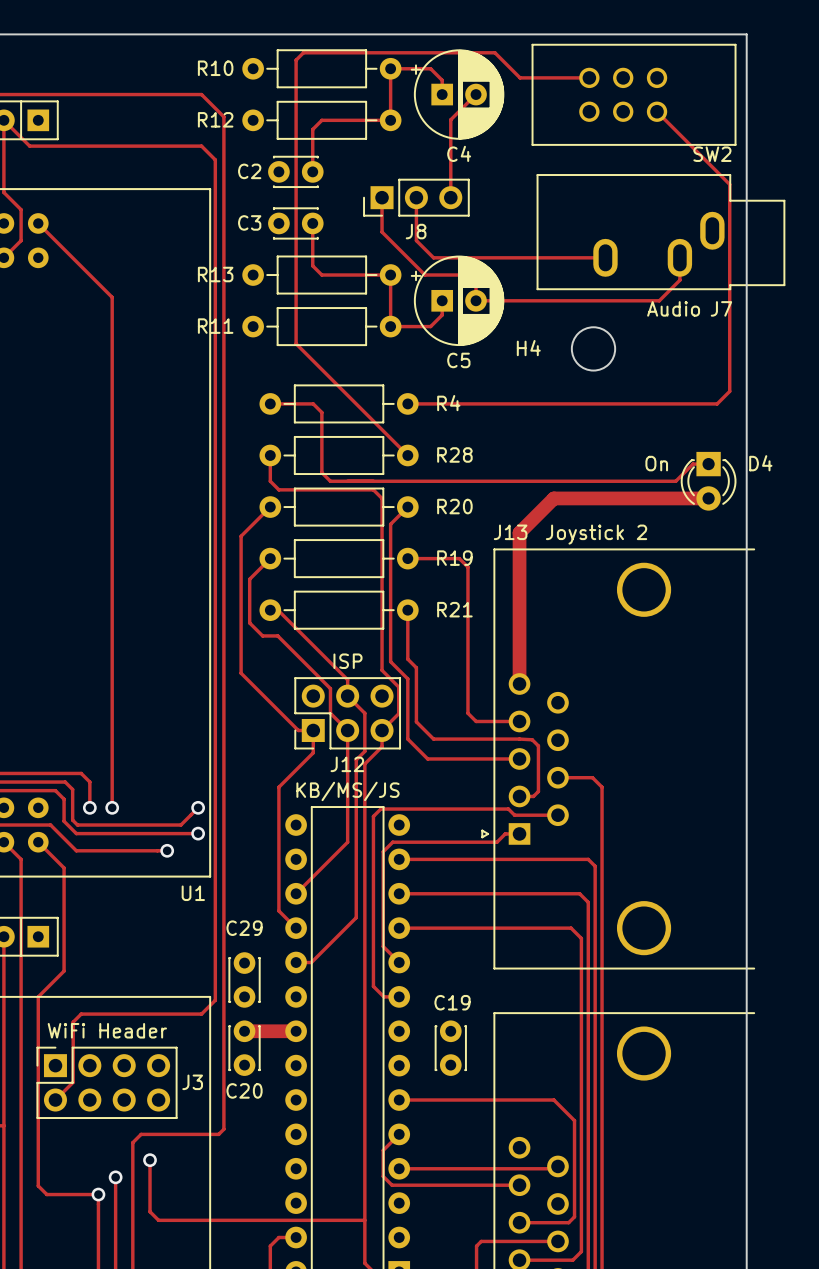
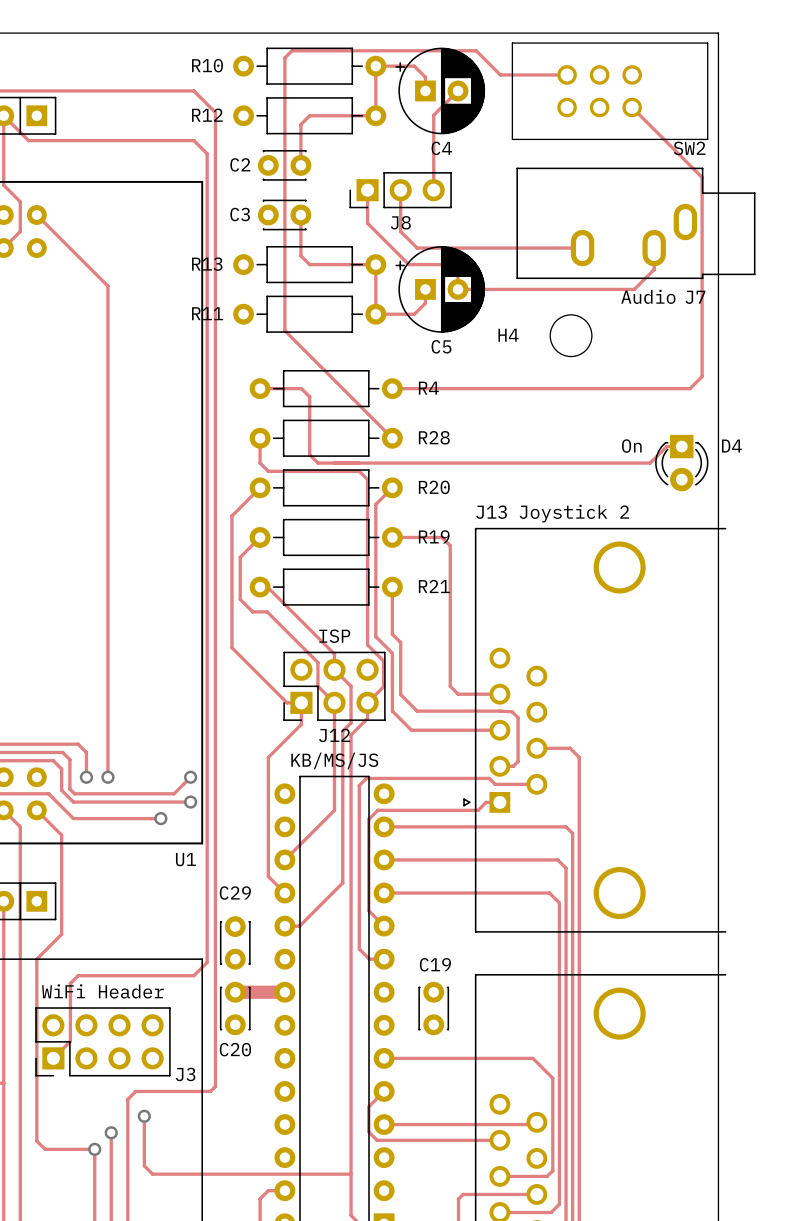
track: (708, 498) (553, 498) (519, 532) (519, 684) -> none
J3 footprint: [36, 1046, 178, 1119] -> [35, 1007, 171, 1077]
J3 name position: J3 (192, 1082) -> J3 (185, 1074)

